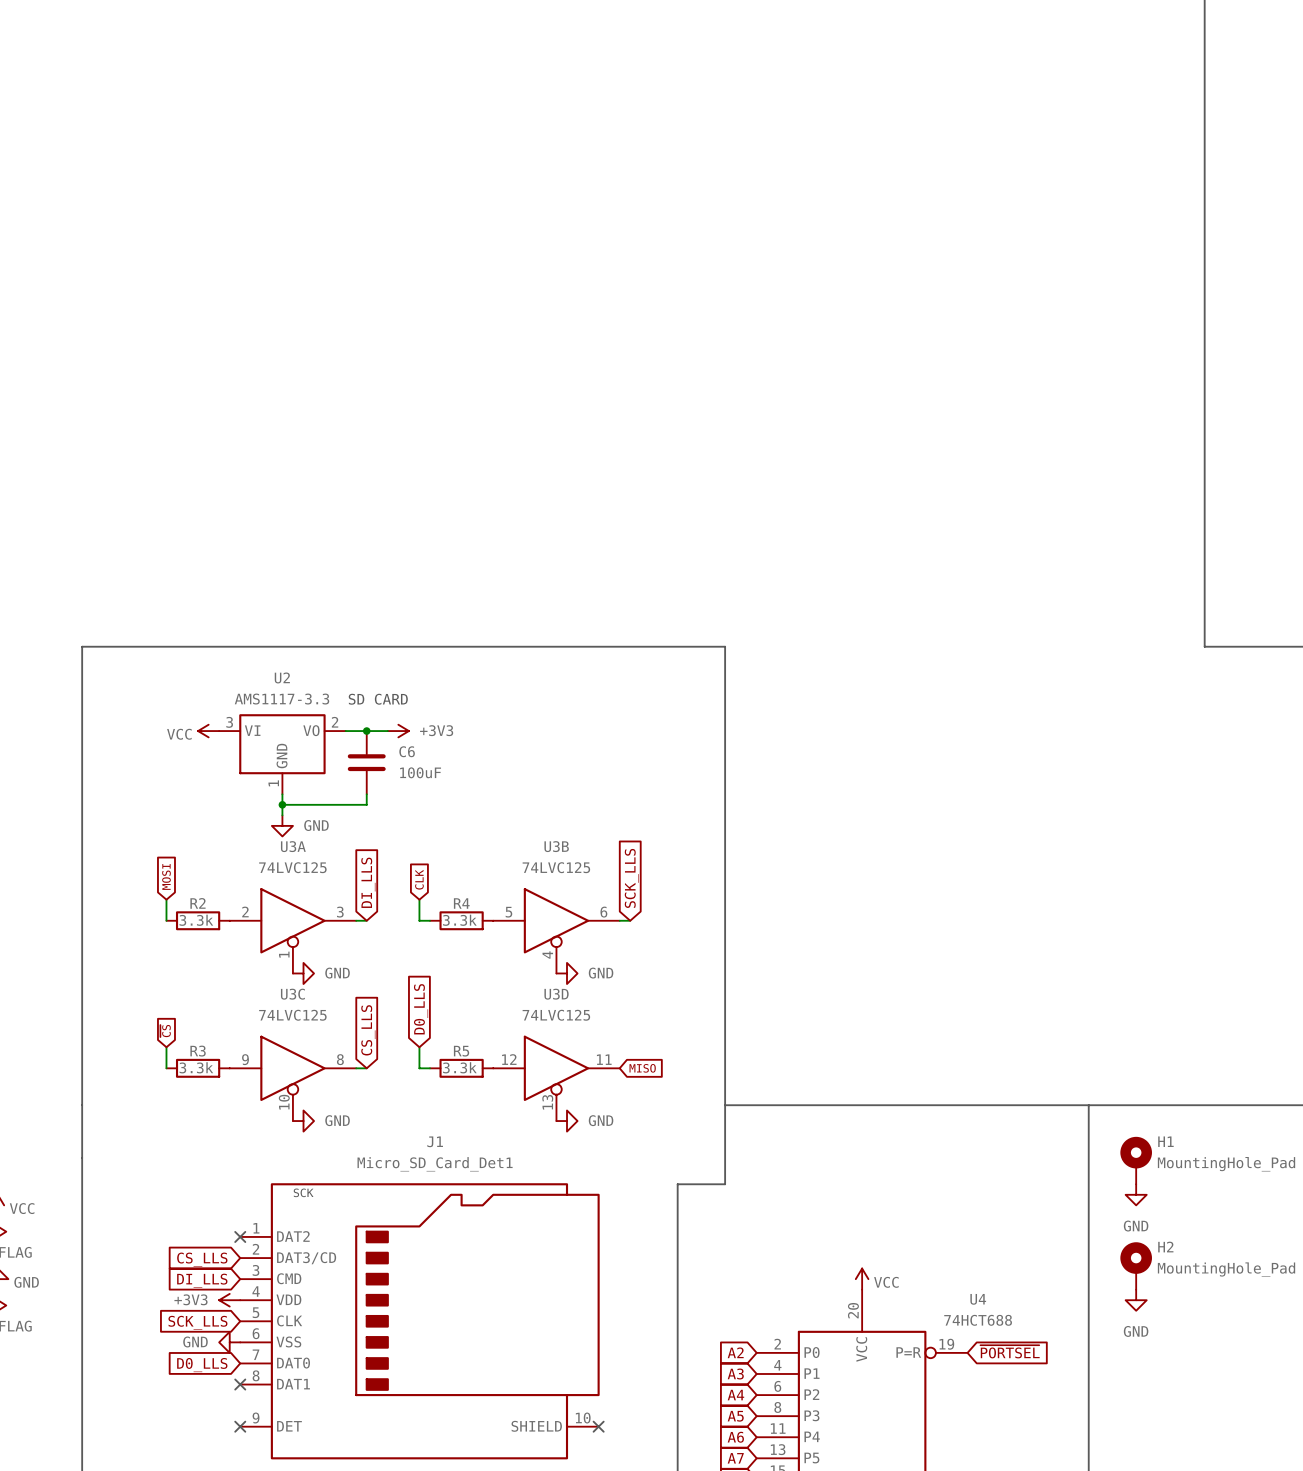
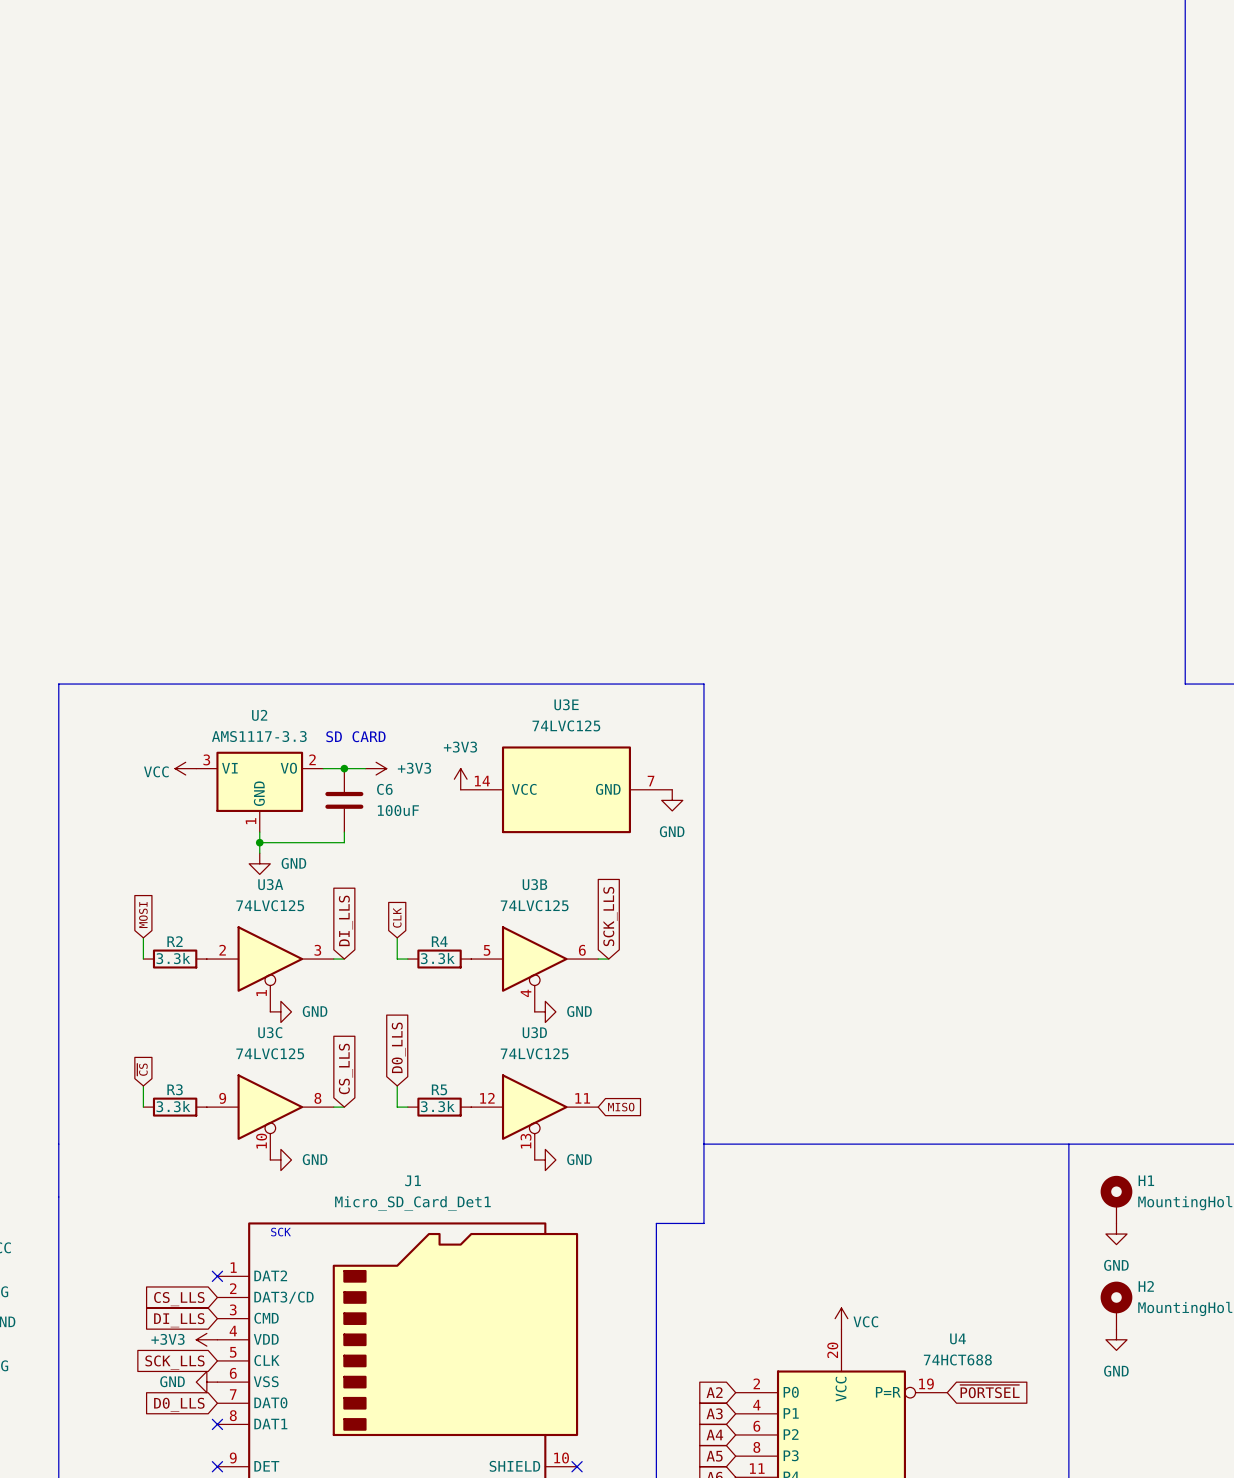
power symbol: none -> +3V3 (460, 779)
U3E: none -> 74LVC125 (566, 789)
power symbol: none -> GND (672, 800)

